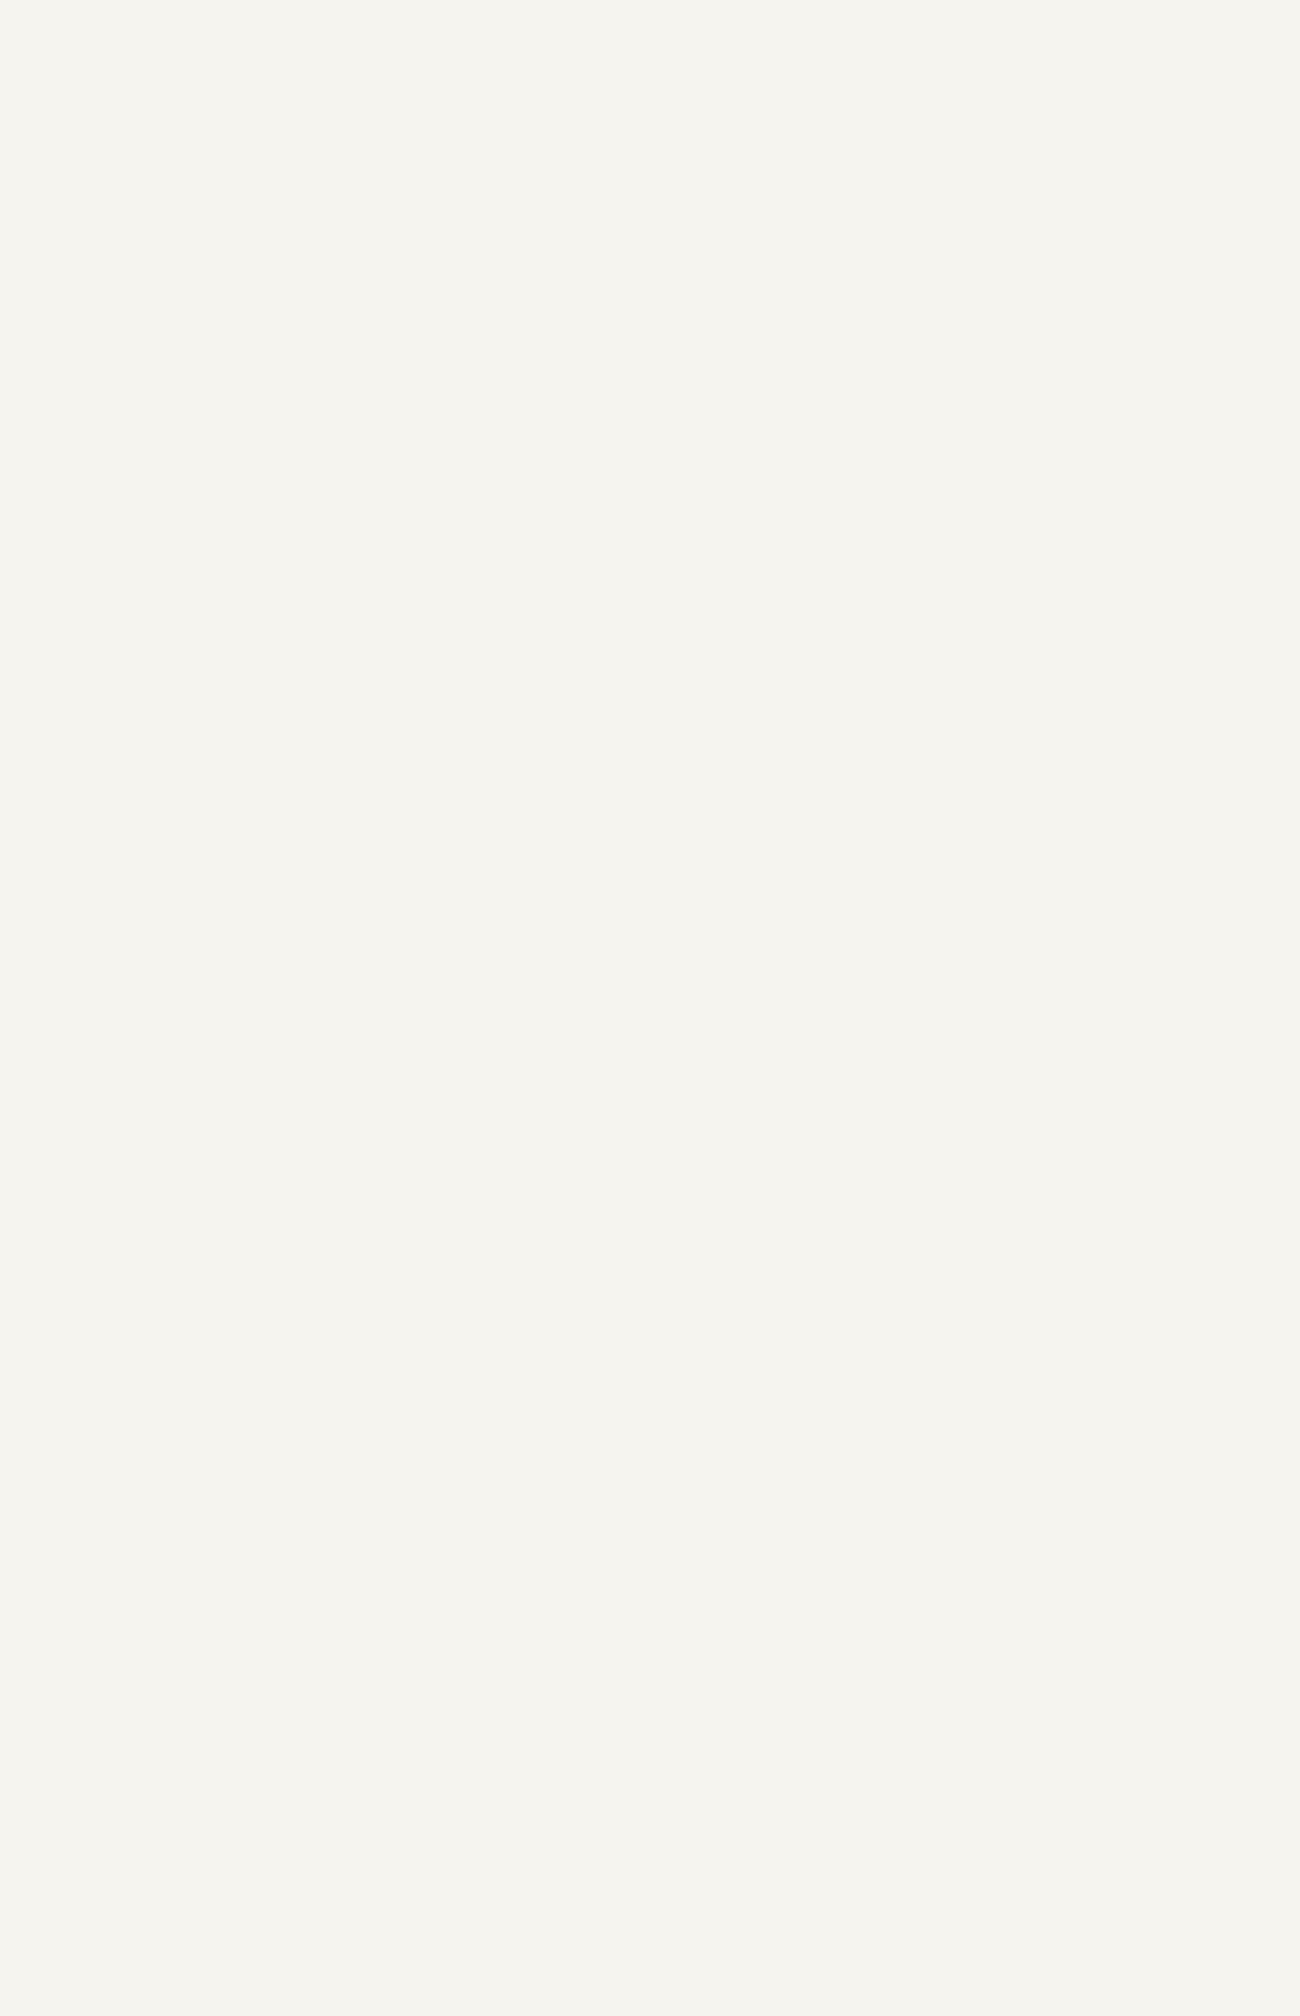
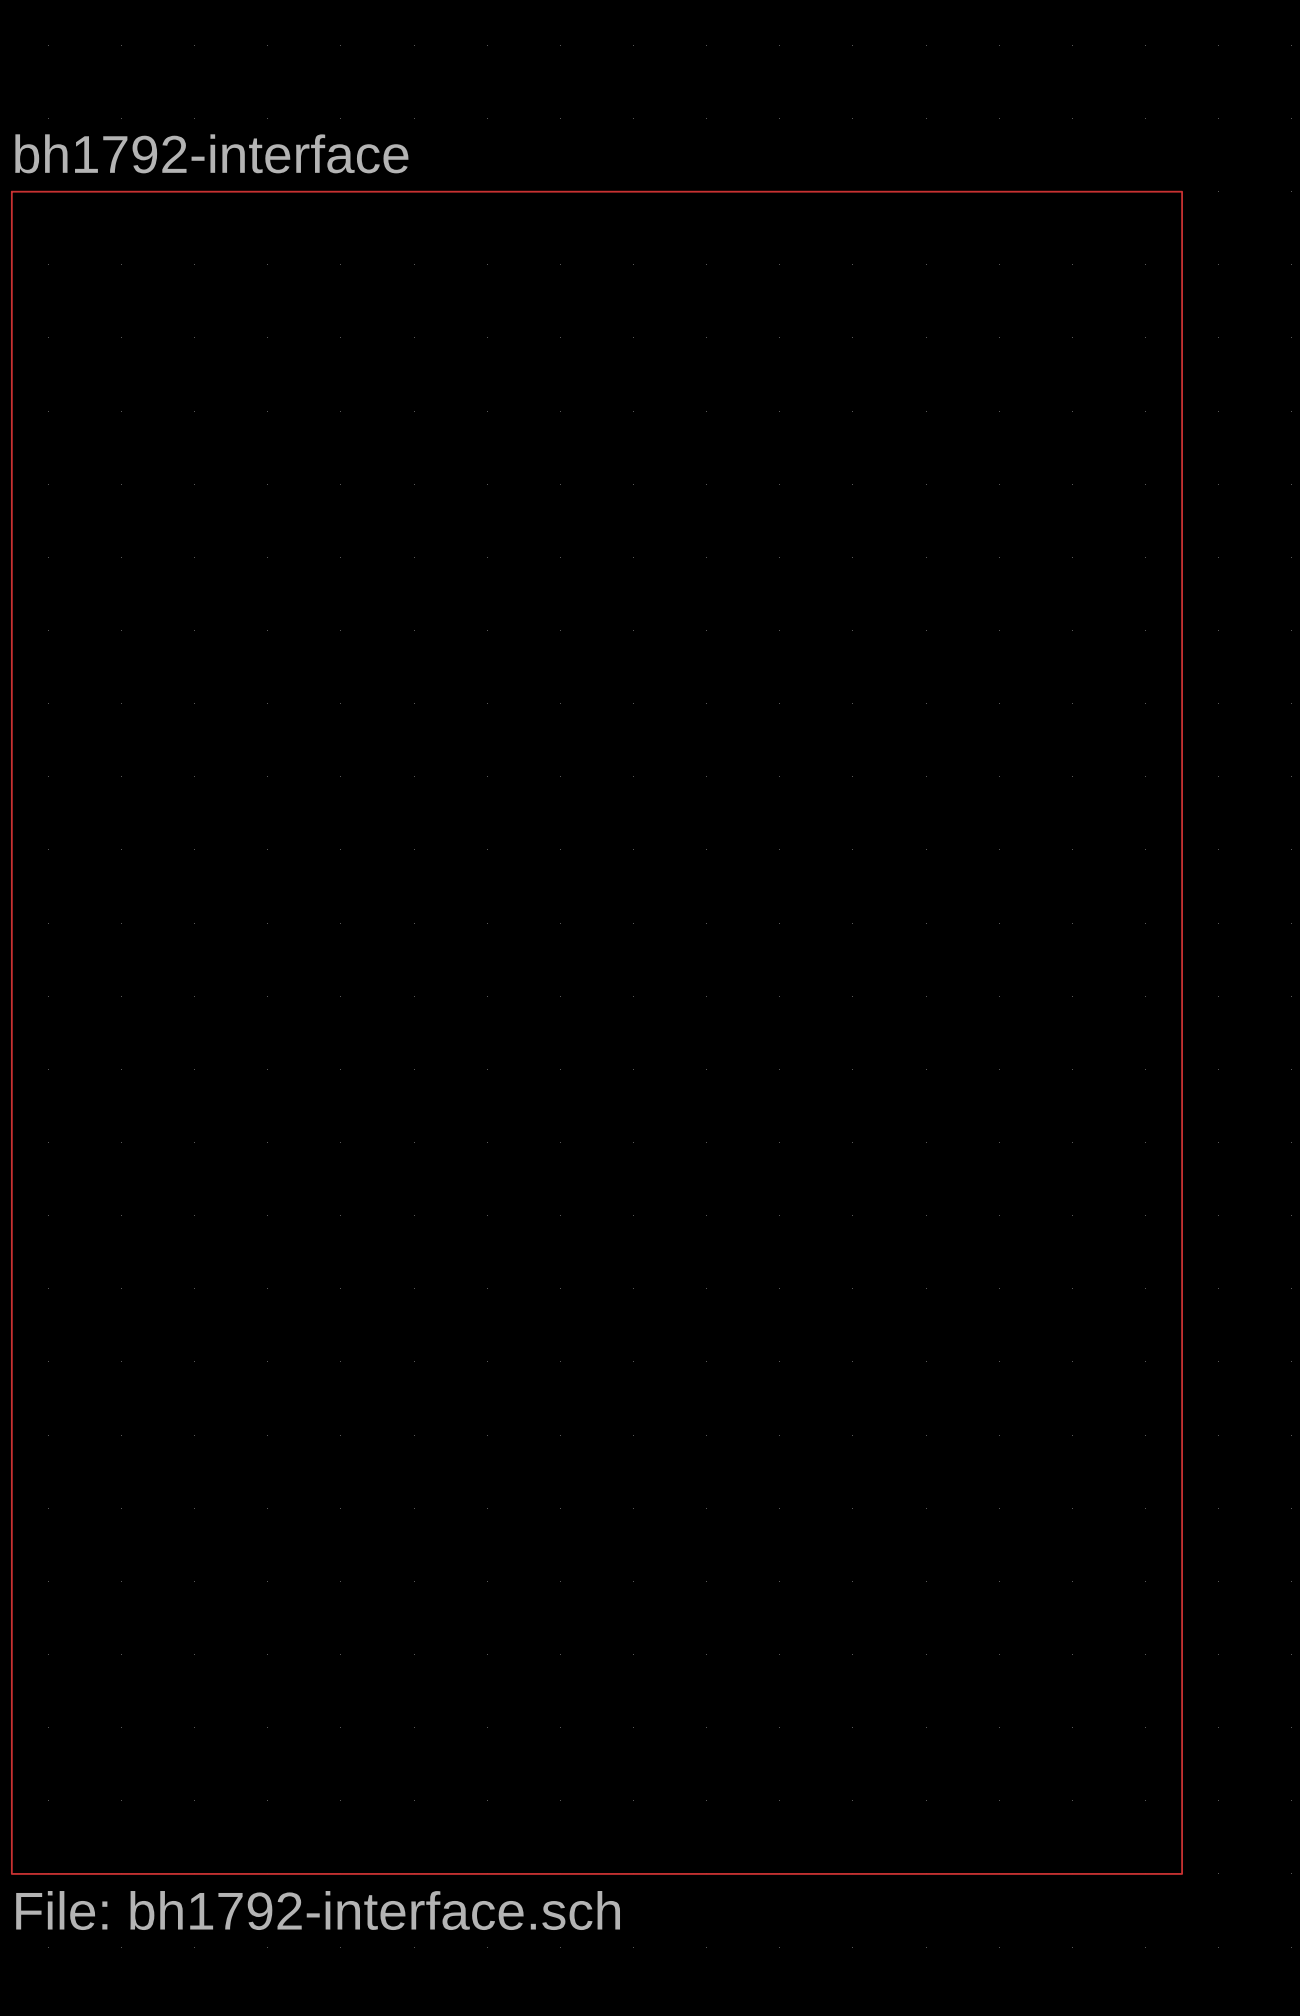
sheet bh1792-interface: none -> File: bh1792-interface.sch (596, 1032)

